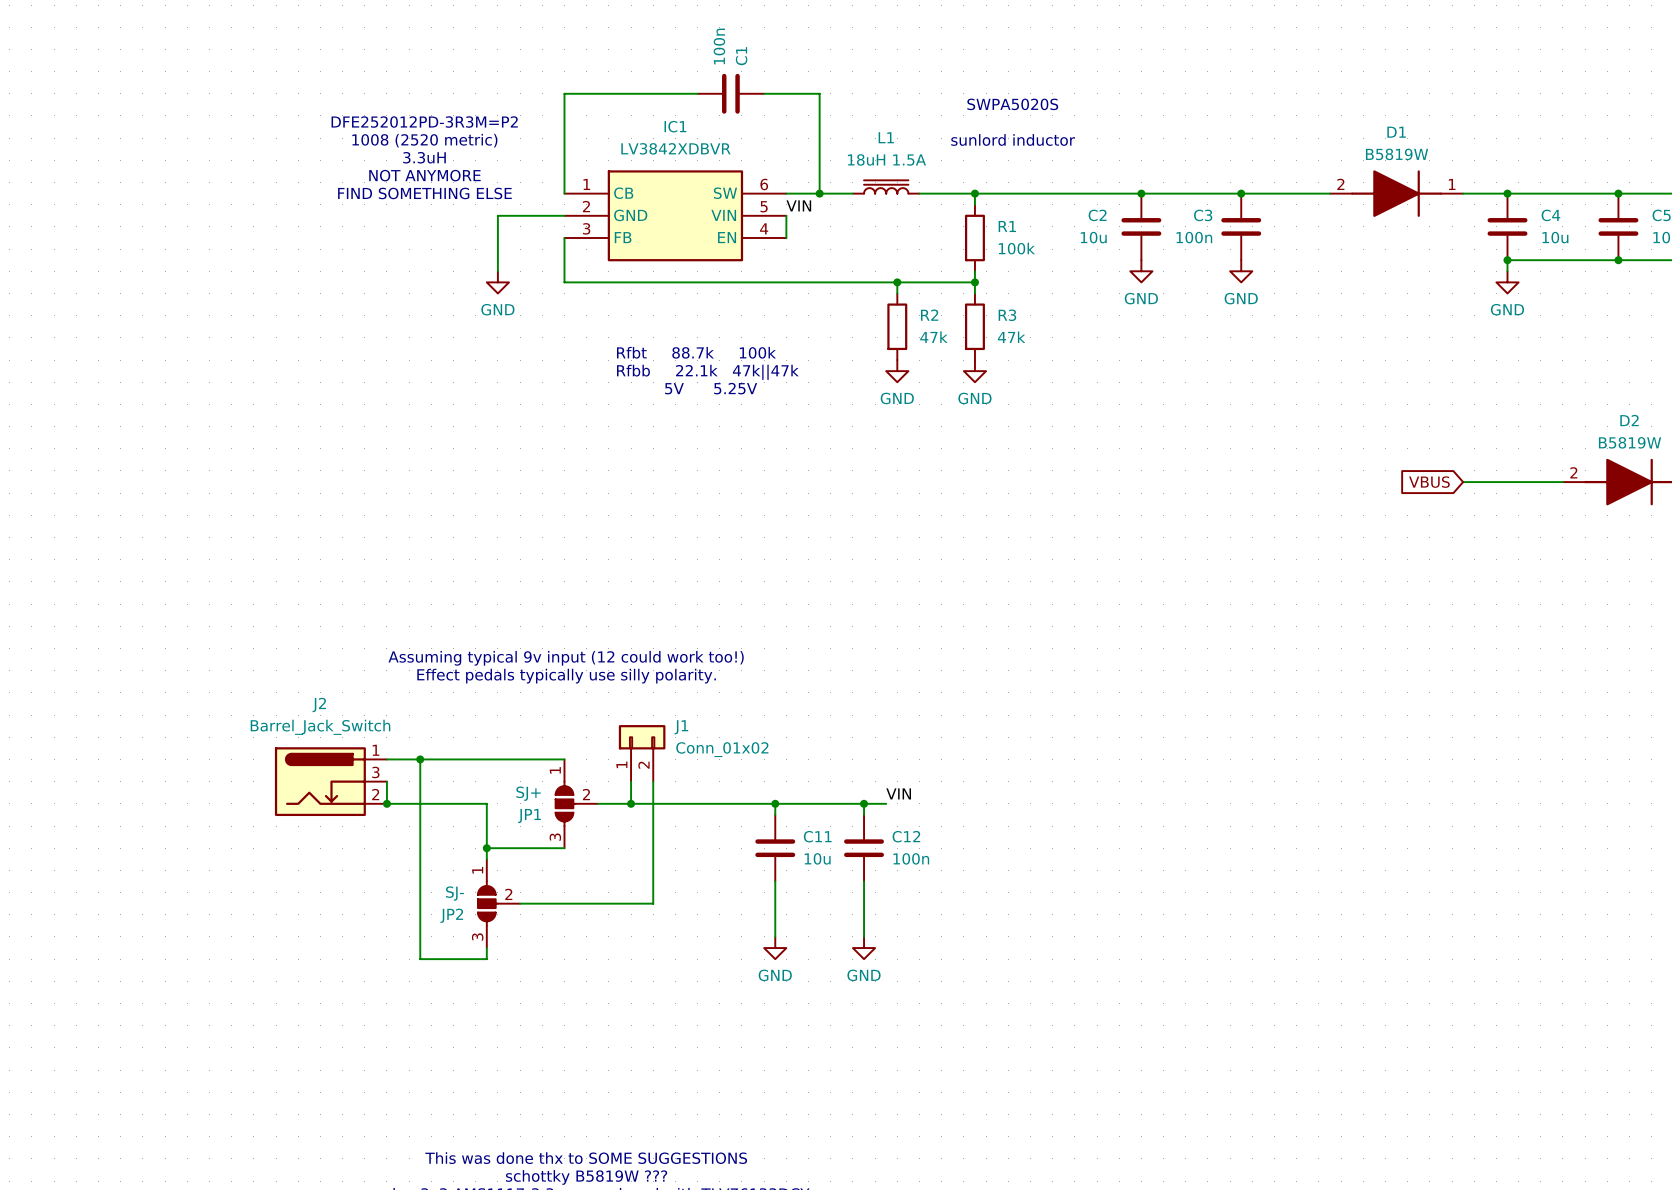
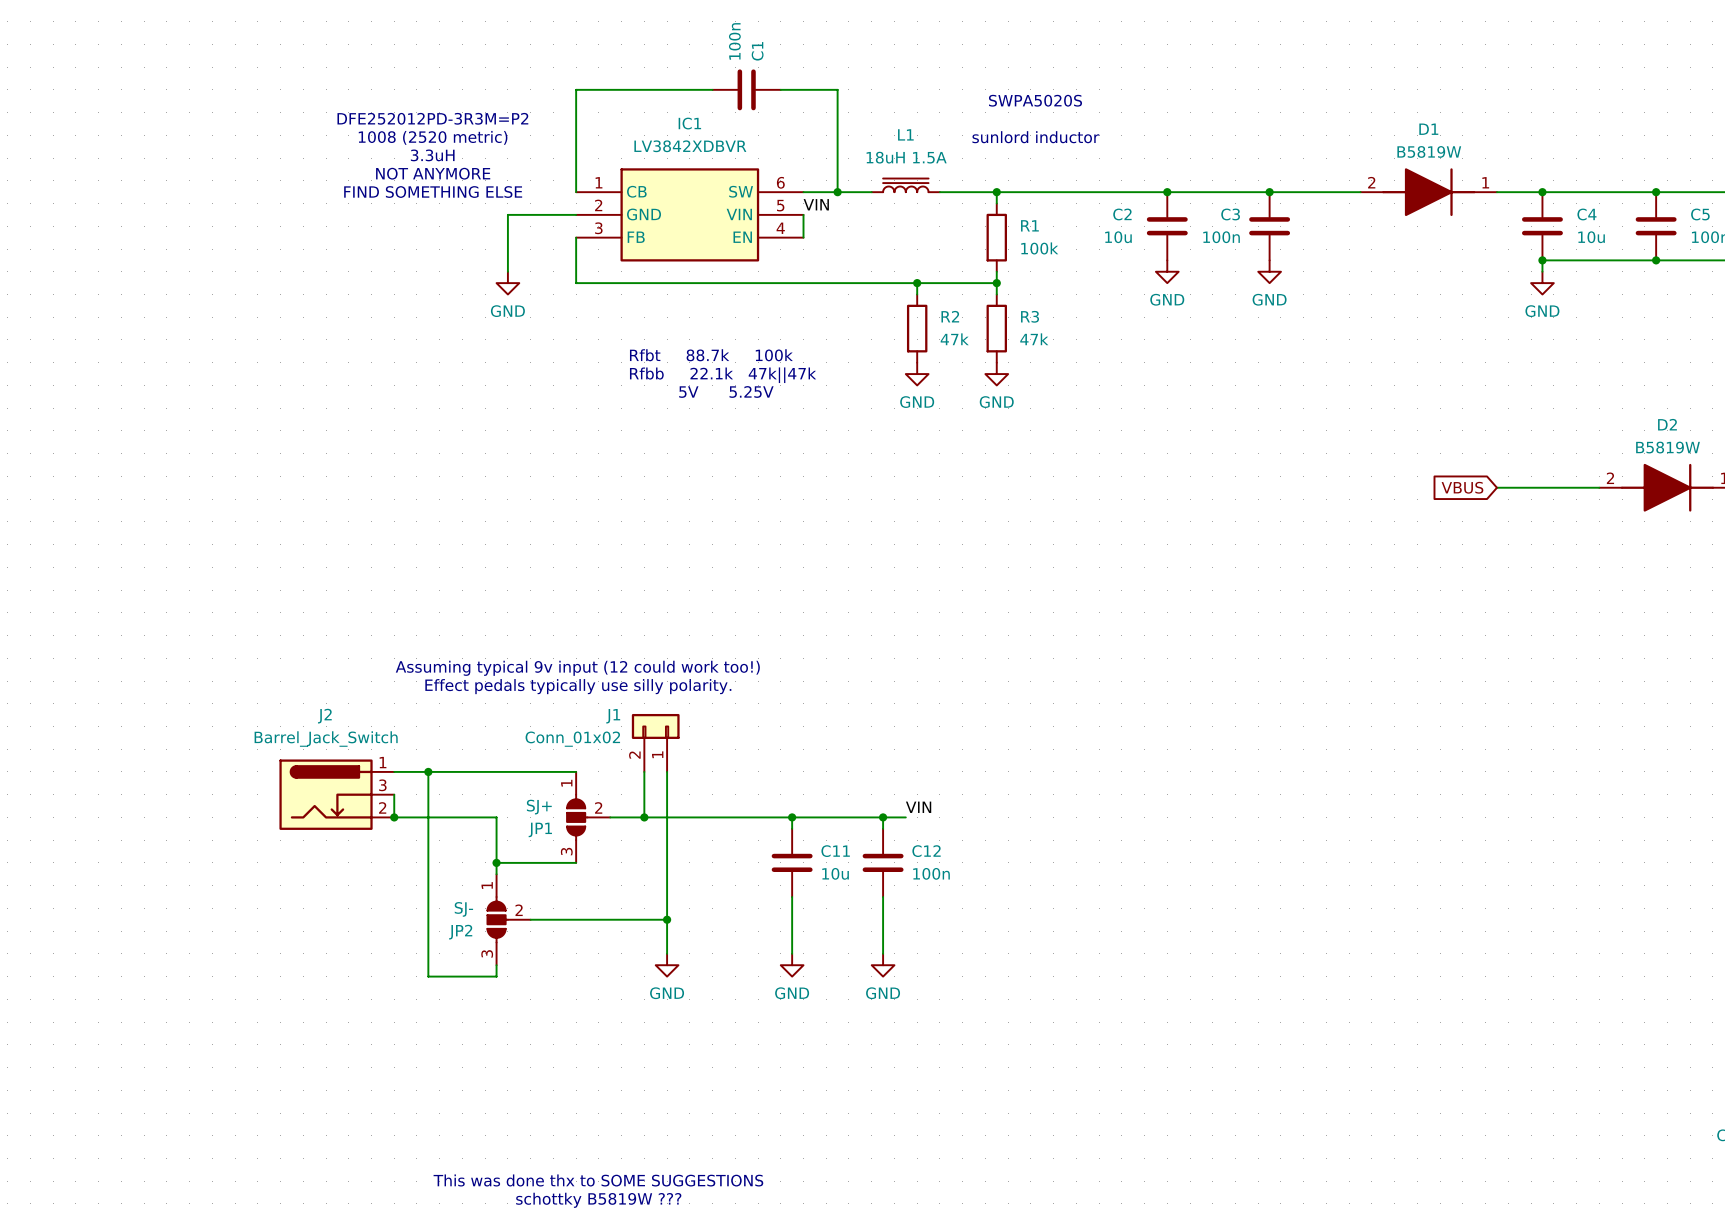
J1 flip: as is (642, 737) -> left-right (655, 726)
wire: none -> (667, 919) (667, 953)
junction: none -> (667, 919)
power symbol: none -> GND (667, 965)

